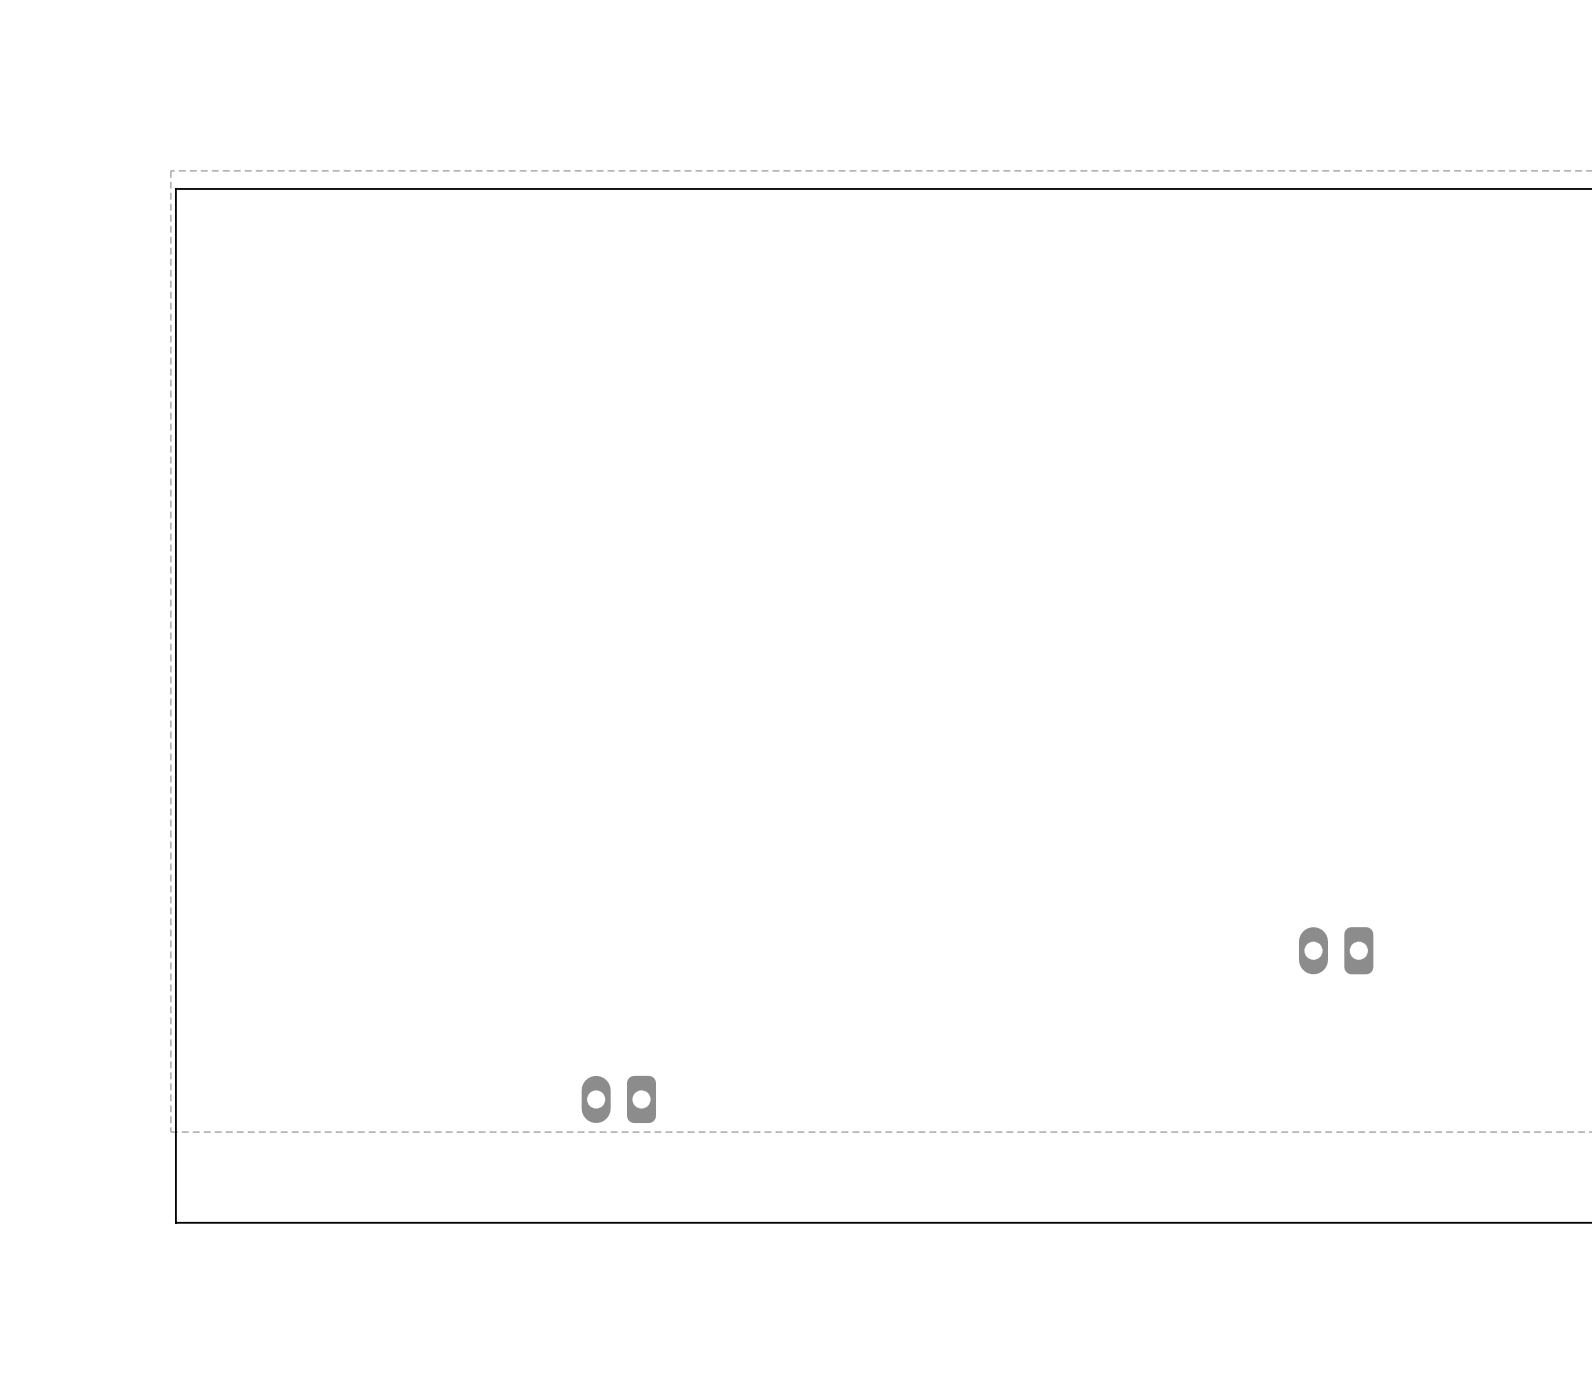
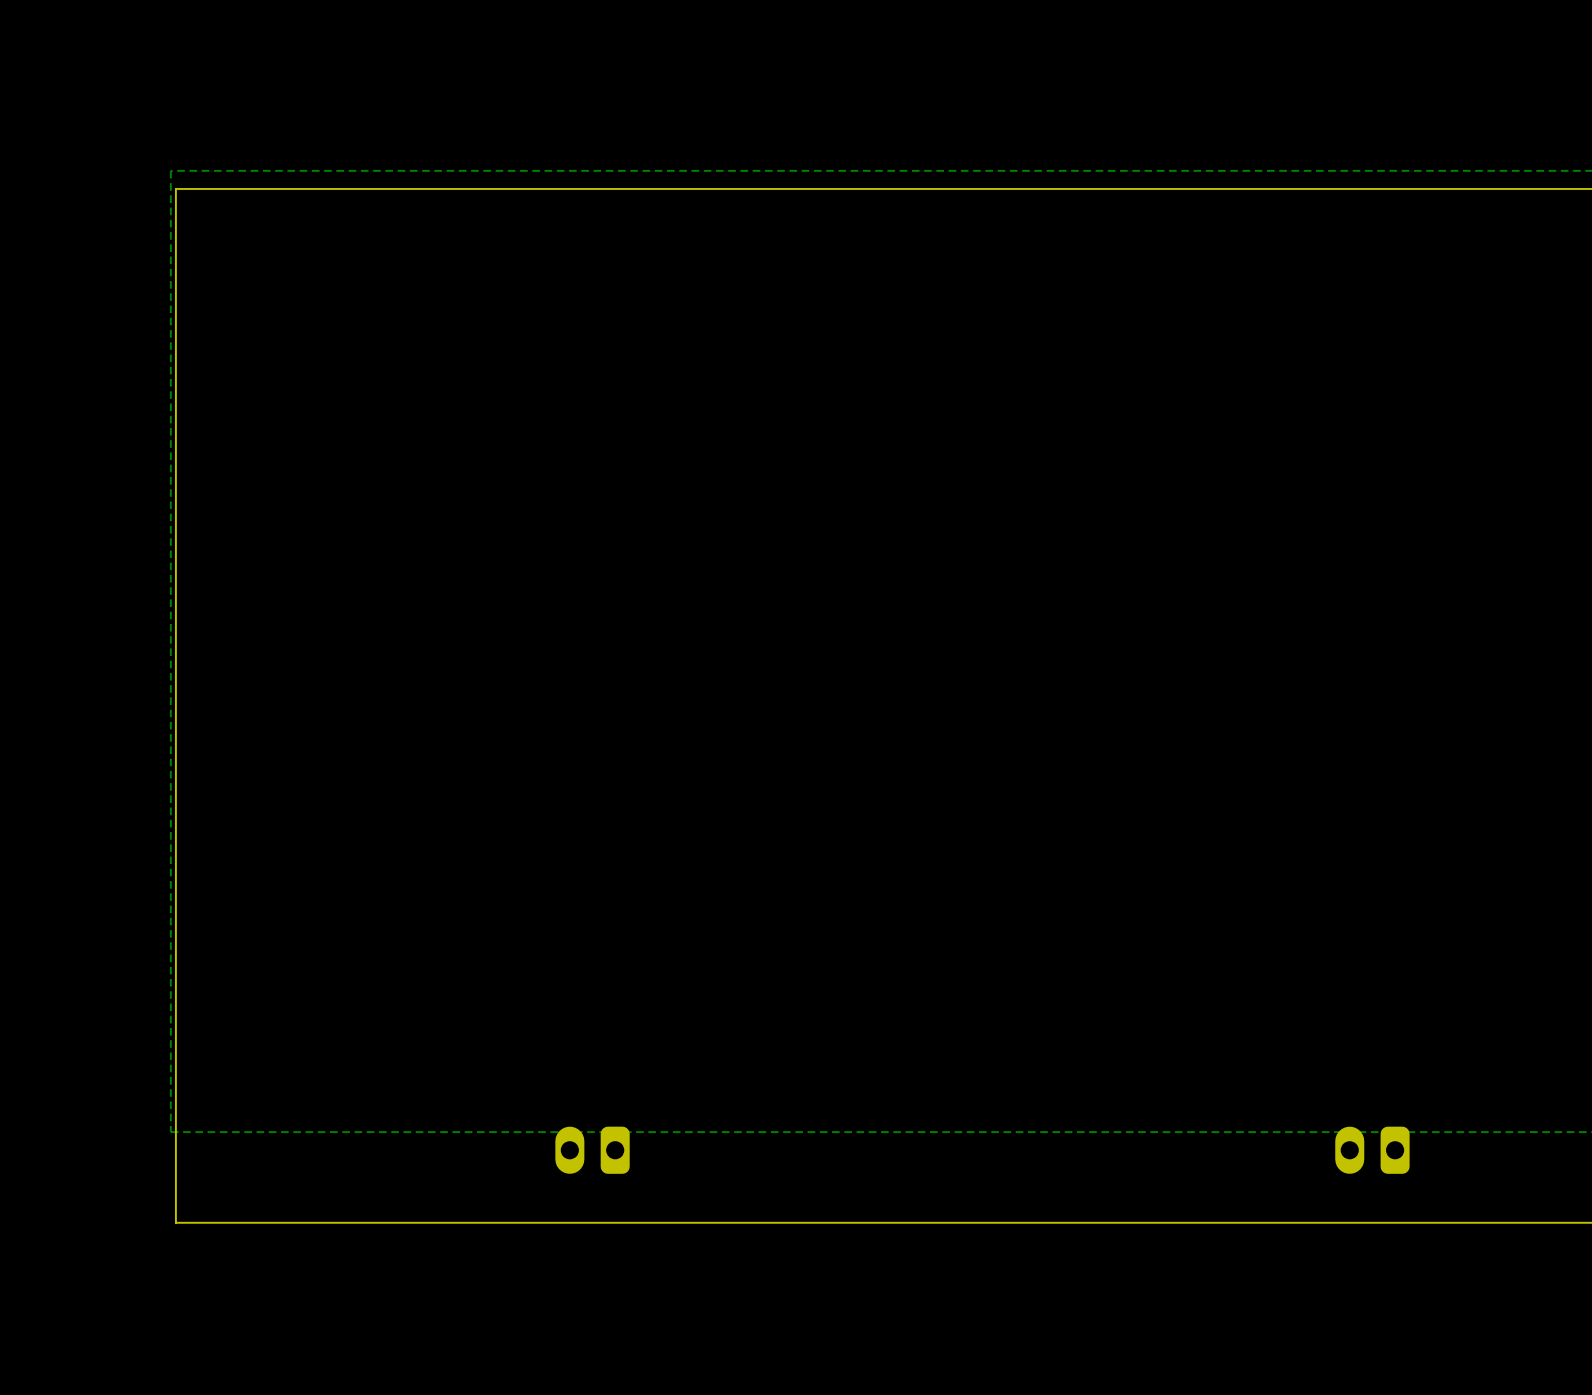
part position: (1336, 950) -> (1372, 1150)
part position: (618, 1099) -> (592, 1150)

